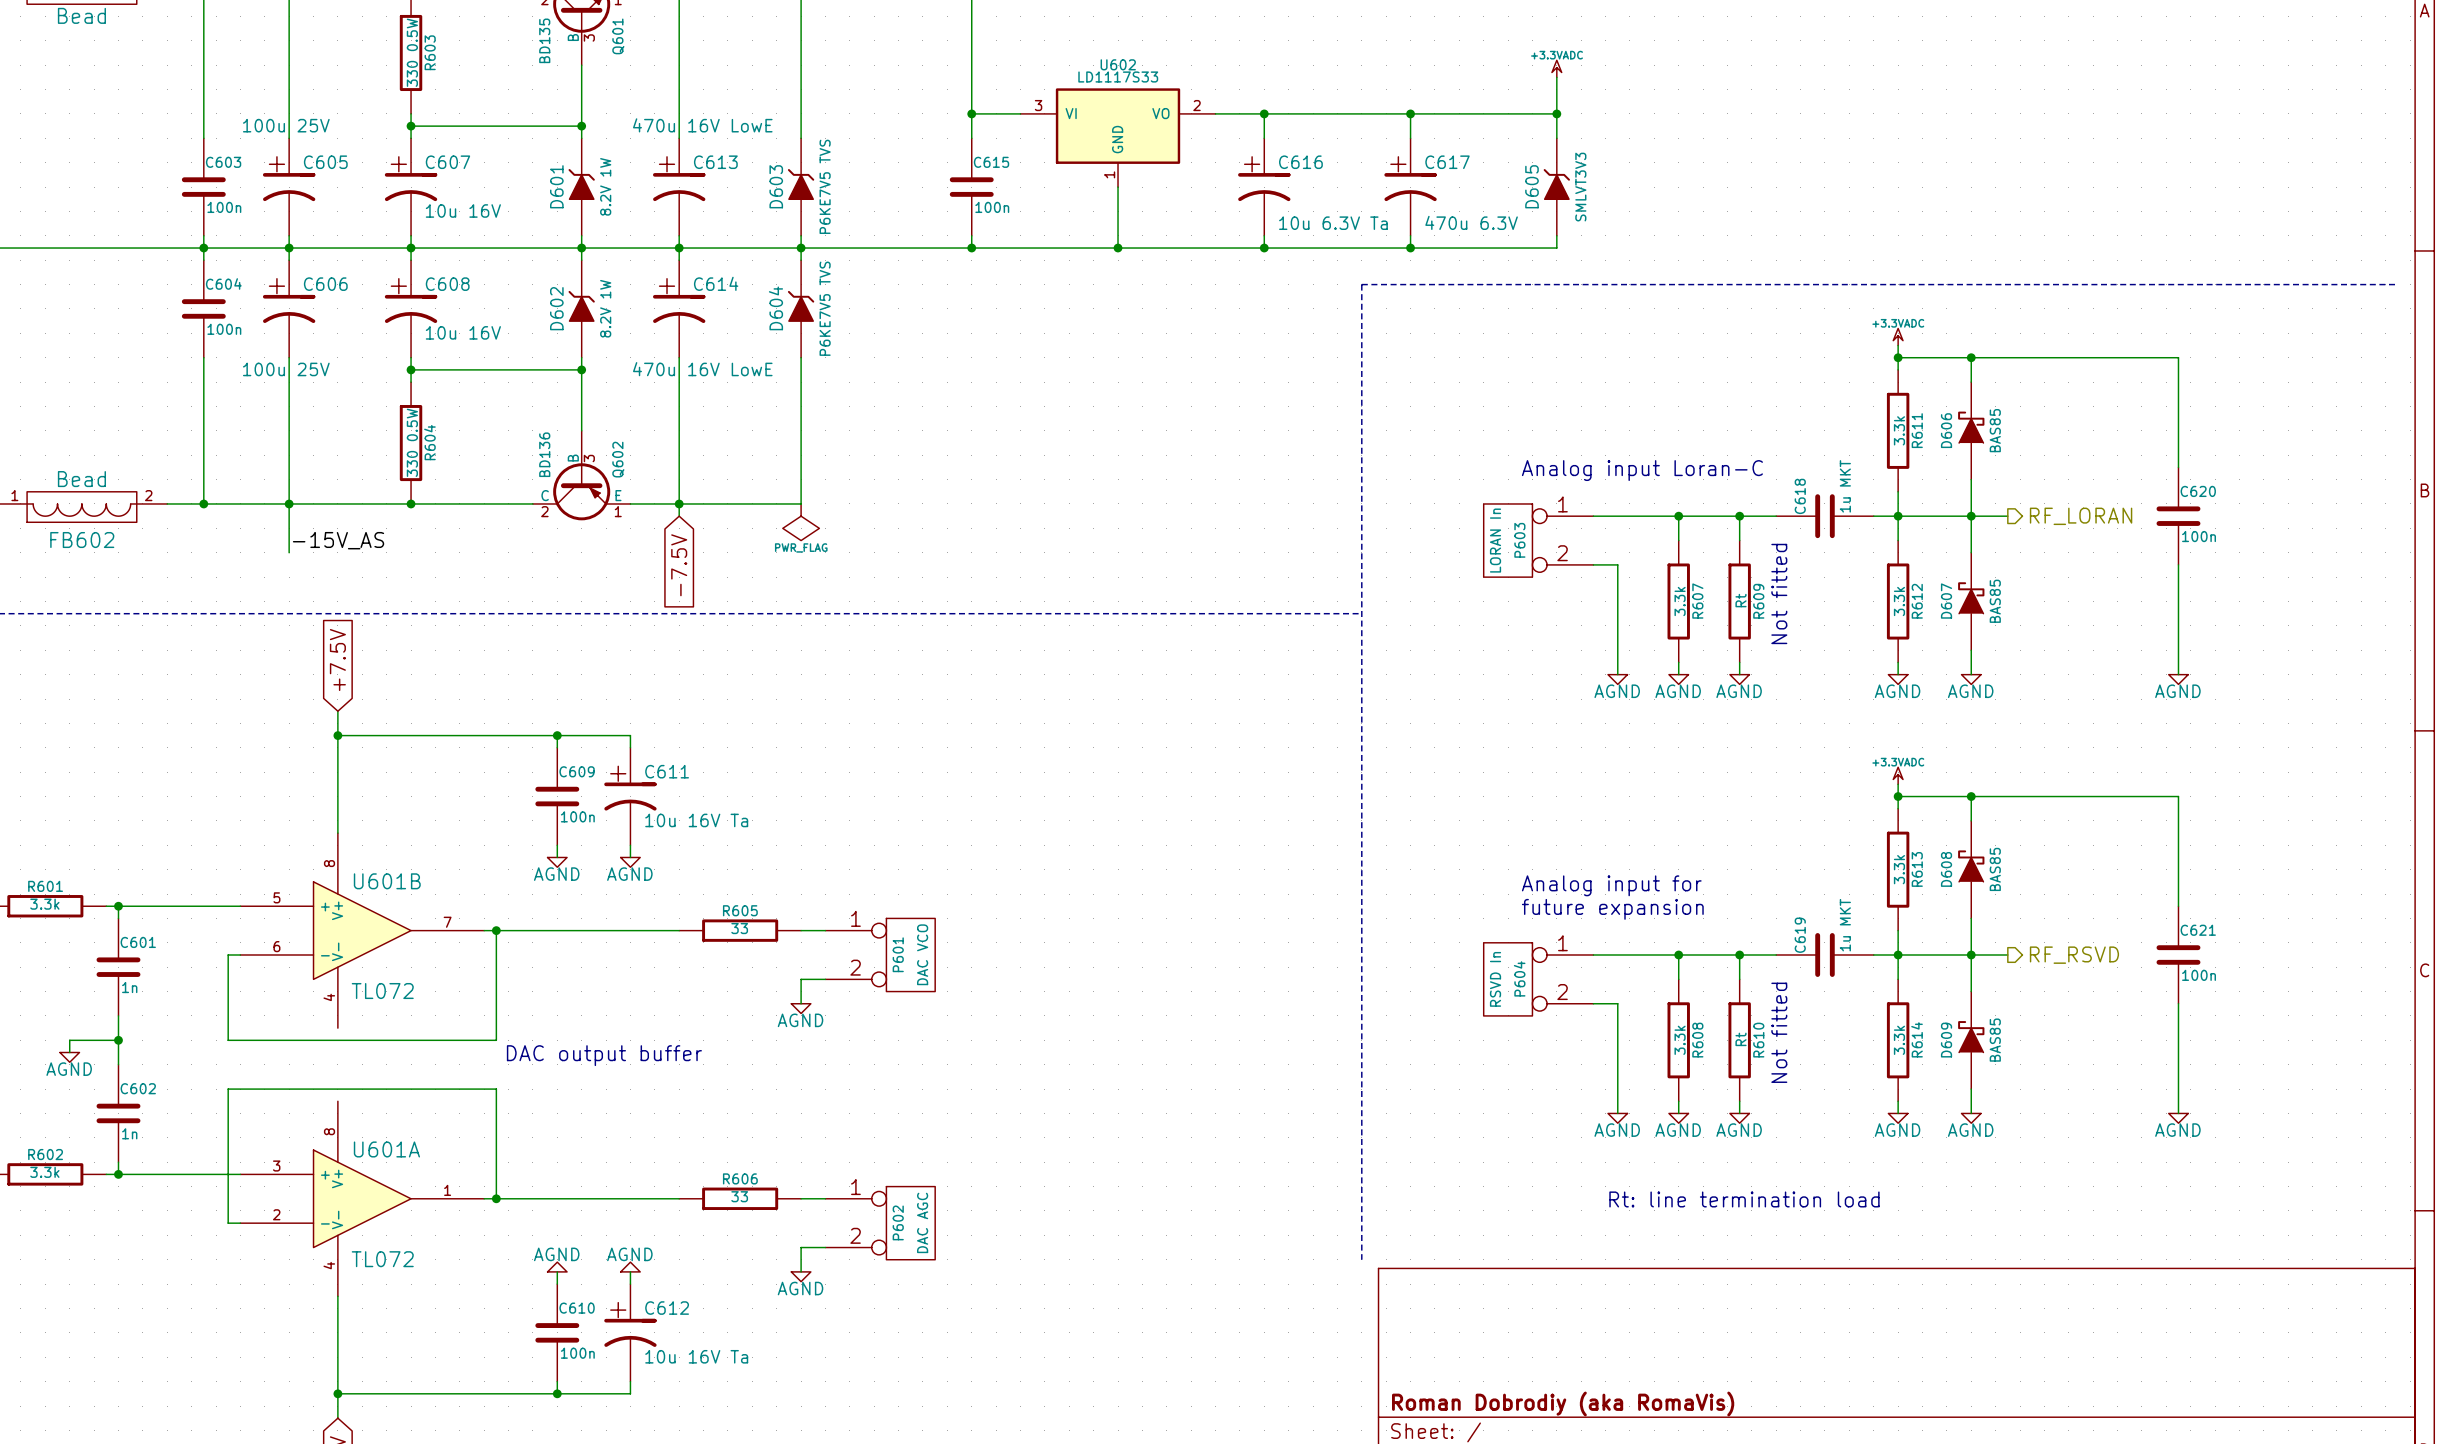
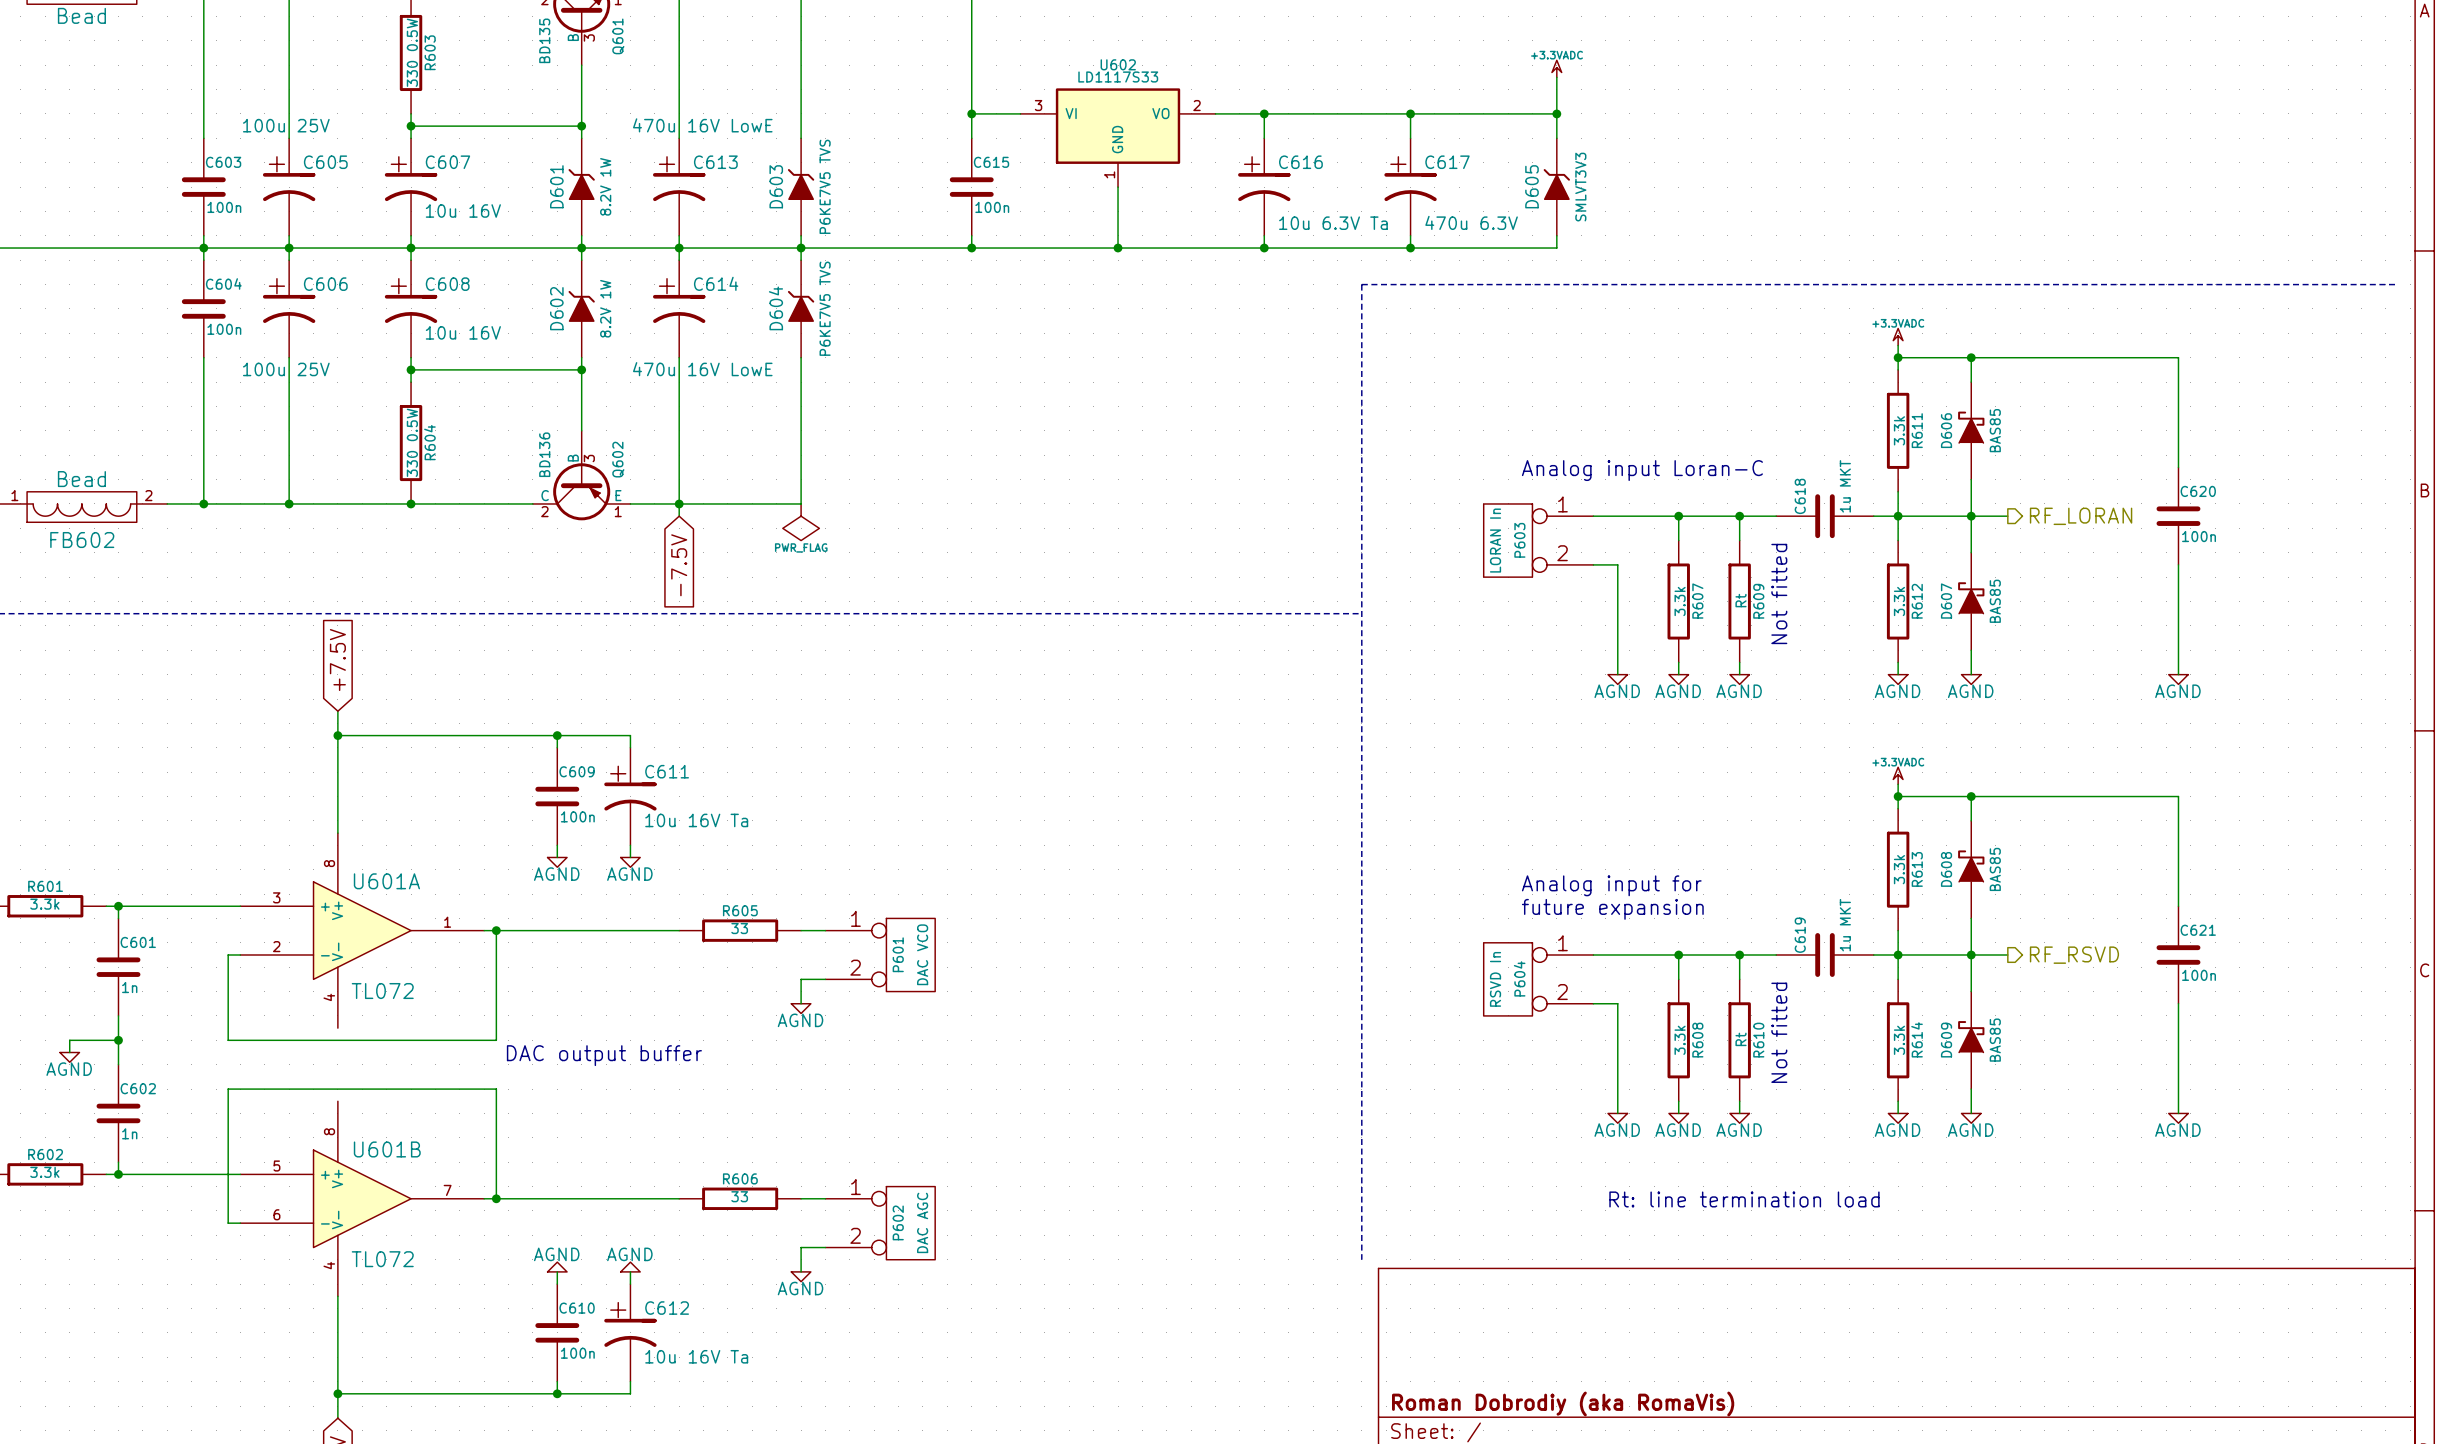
wire: (289, 503) (289, 552) -> none
label: -15V_AS (338, 540) -> none
U601B position: (362, 930) -> (362, 1198)
U601A position: (362, 1198) -> (362, 930)

